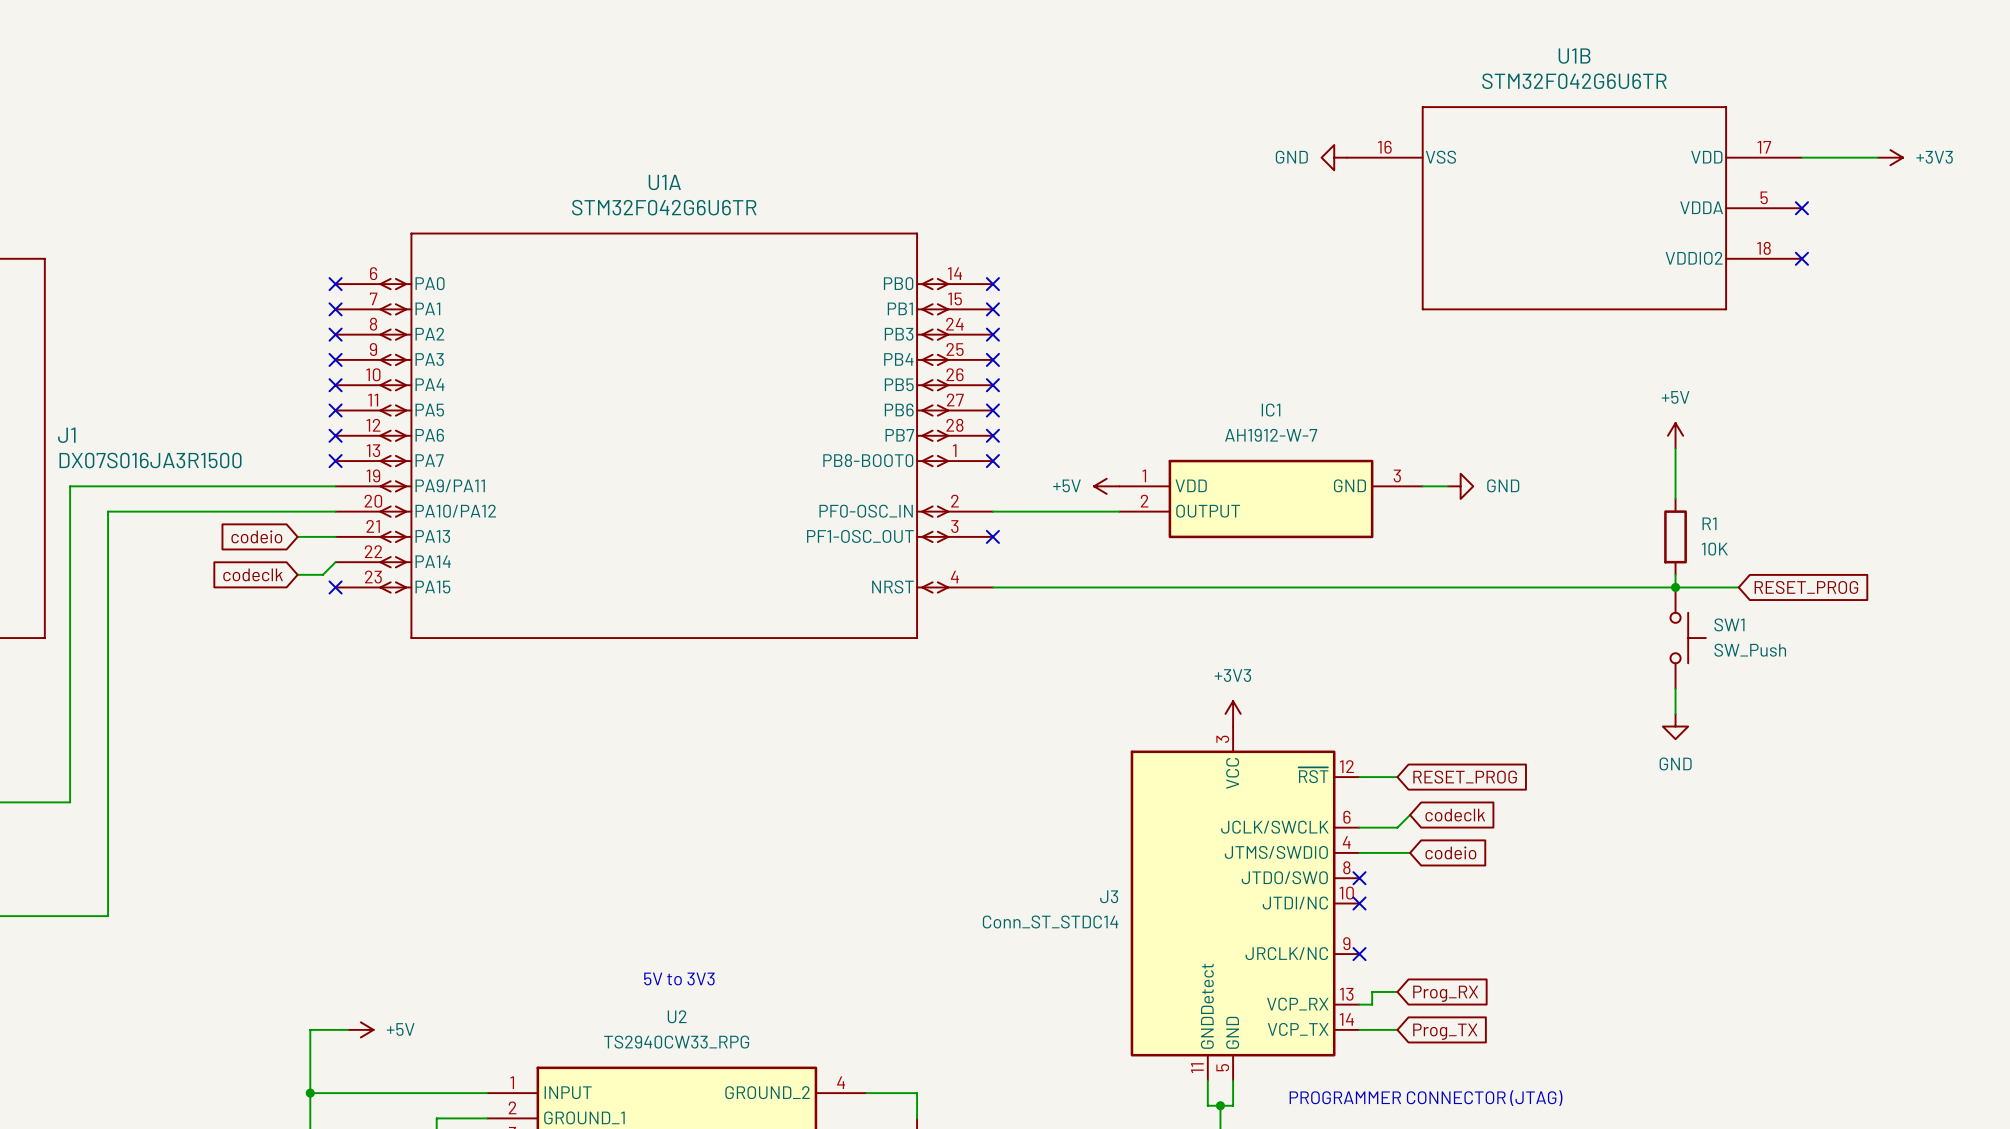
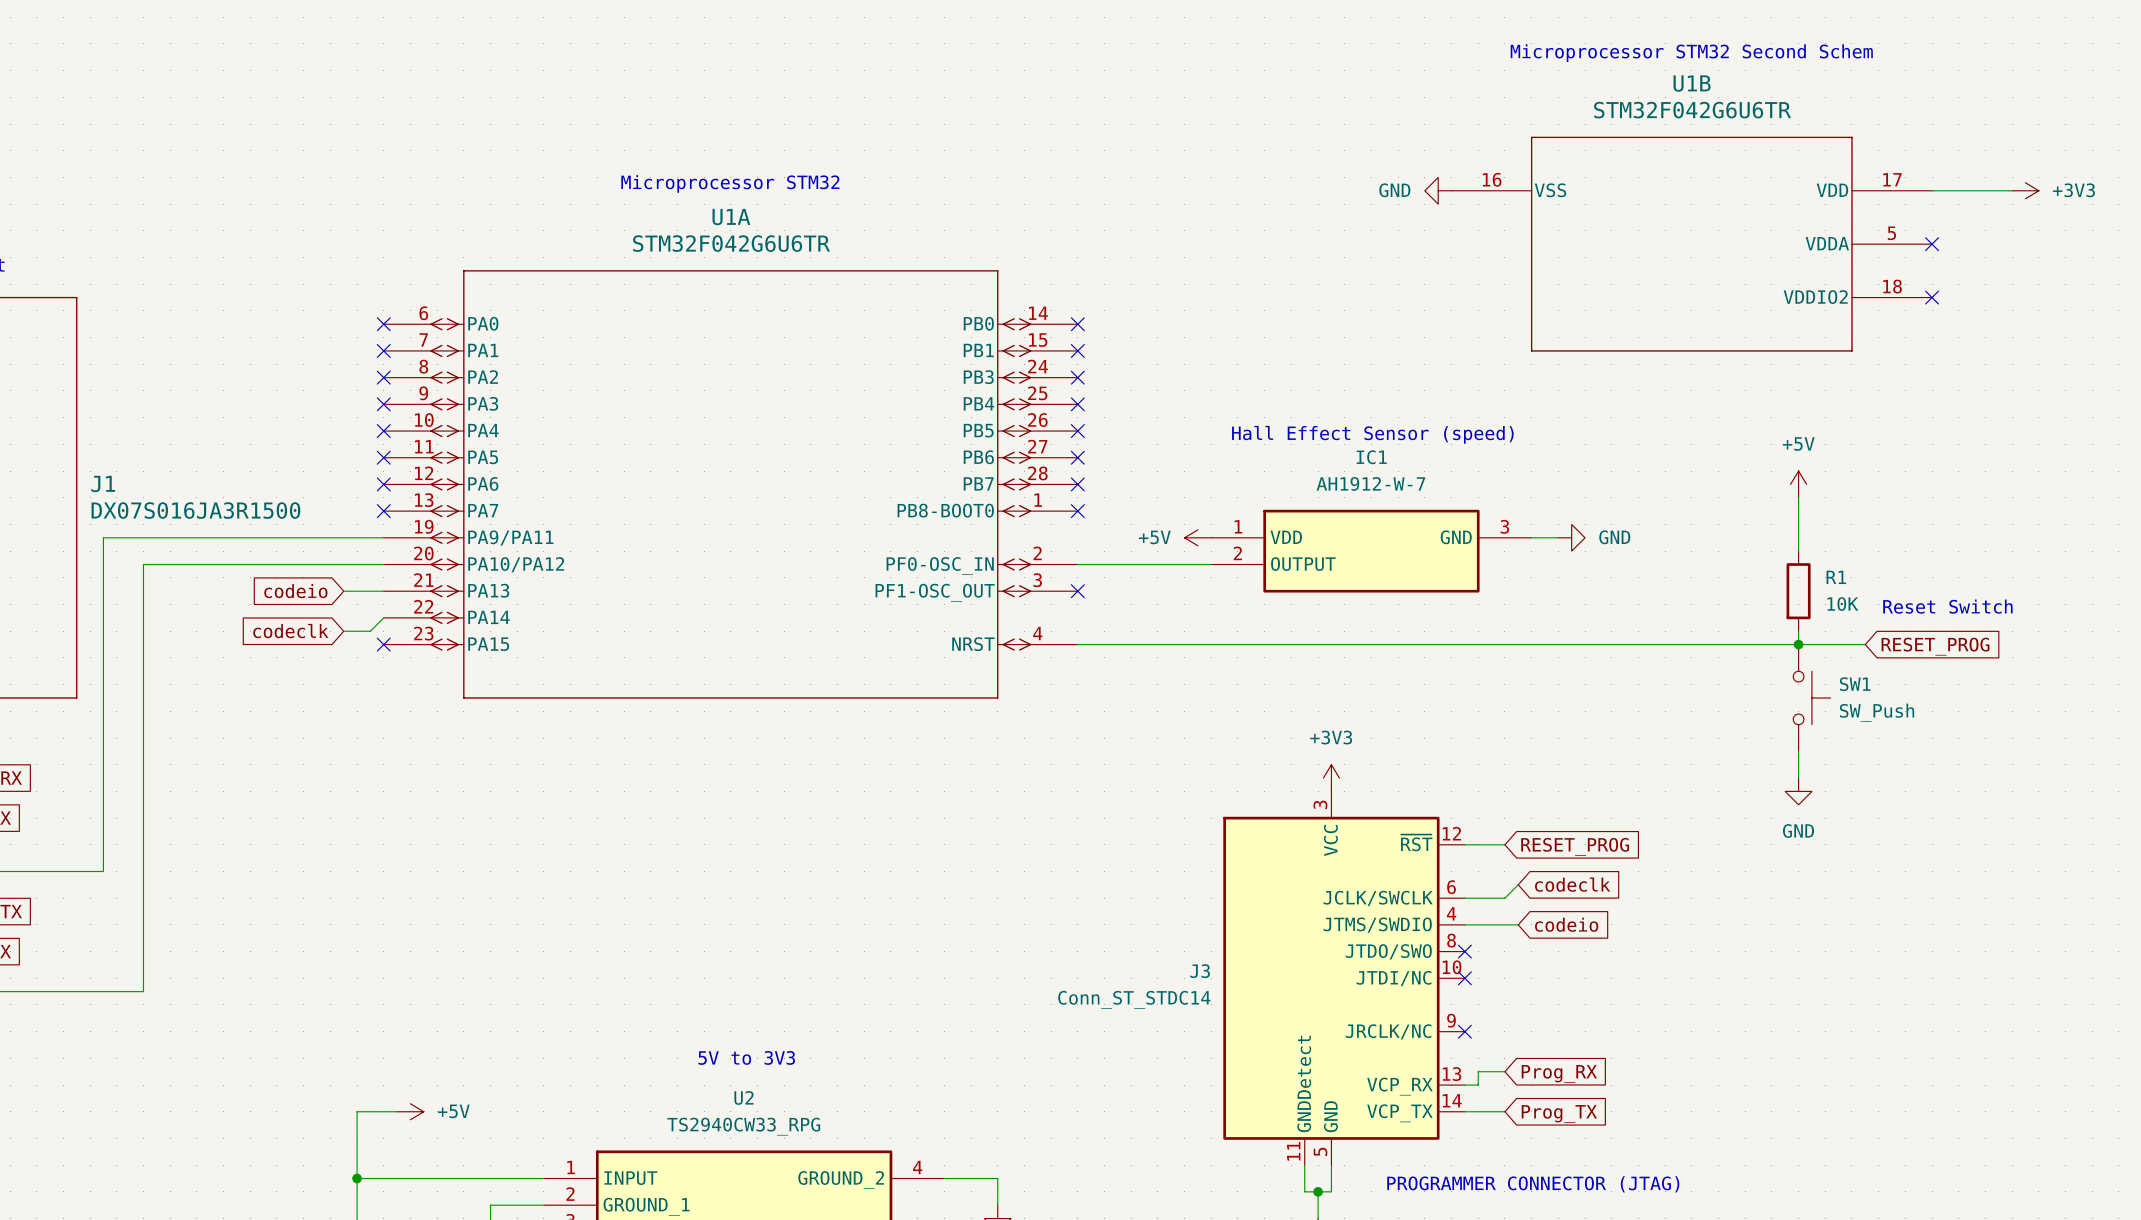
text: none -> Microprocessor STM32 Second Schem (1691, 53)
text: none -> Microprocessor STM32 (730, 183)
text: none -> Hall Effect Sensor (speed) (1372, 434)
text: none -> Reset Switch (1947, 606)

